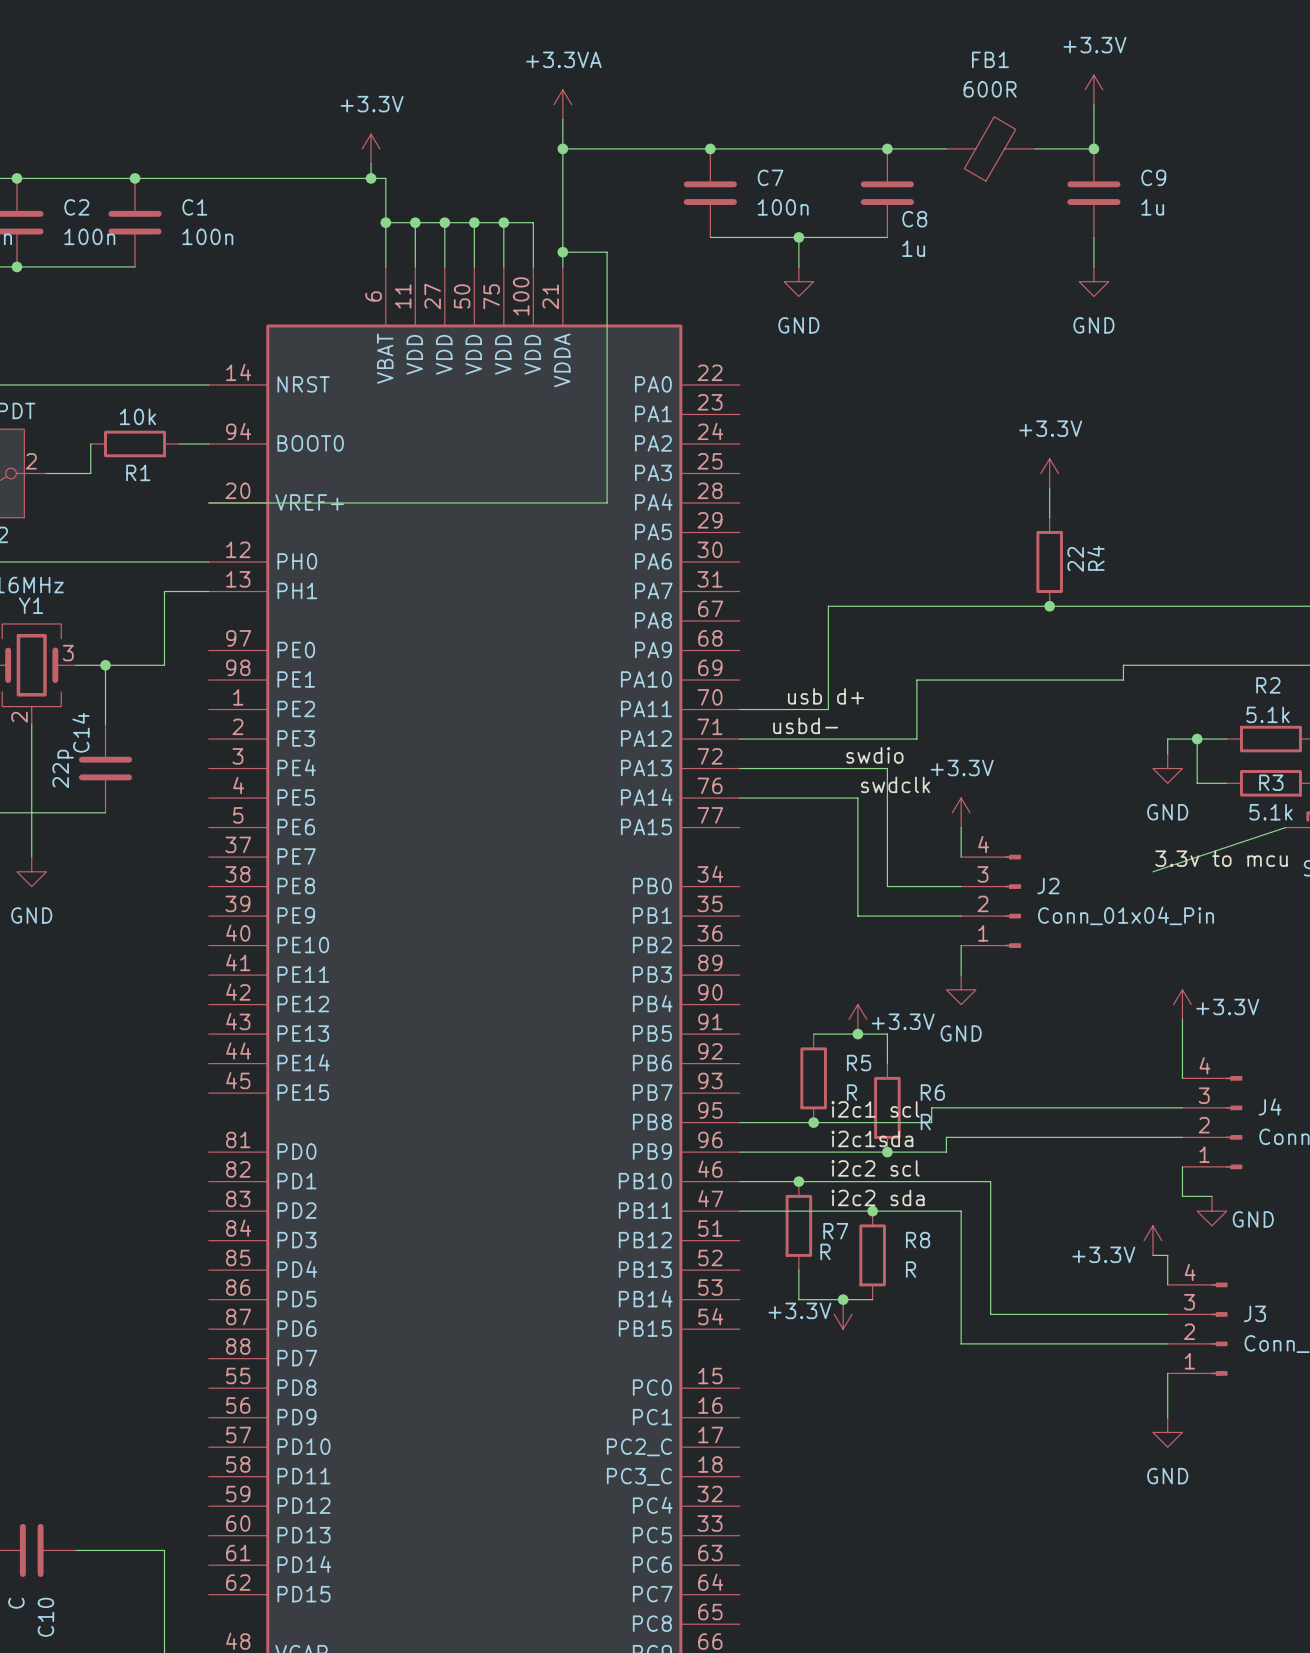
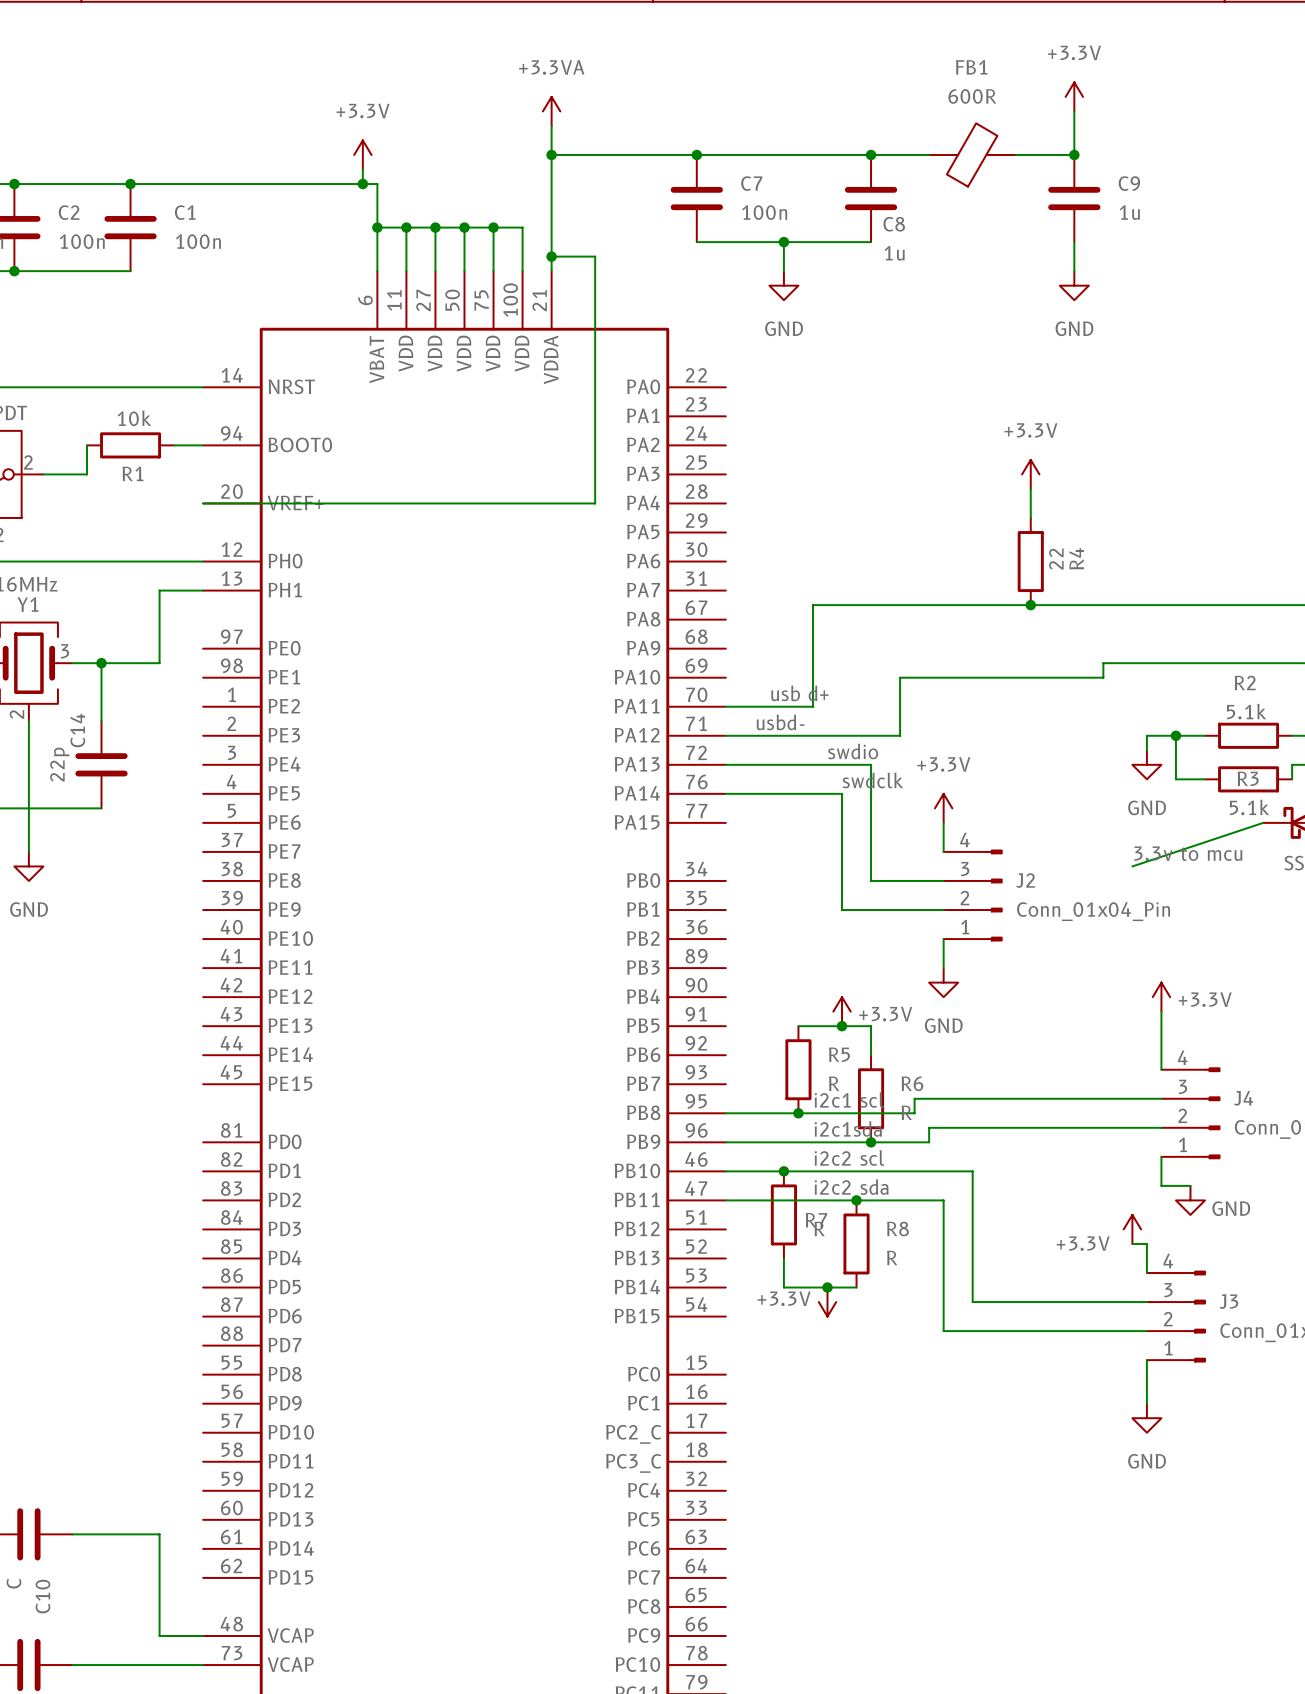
R7 value position: R (825, 1251) -> R (819, 1228)

